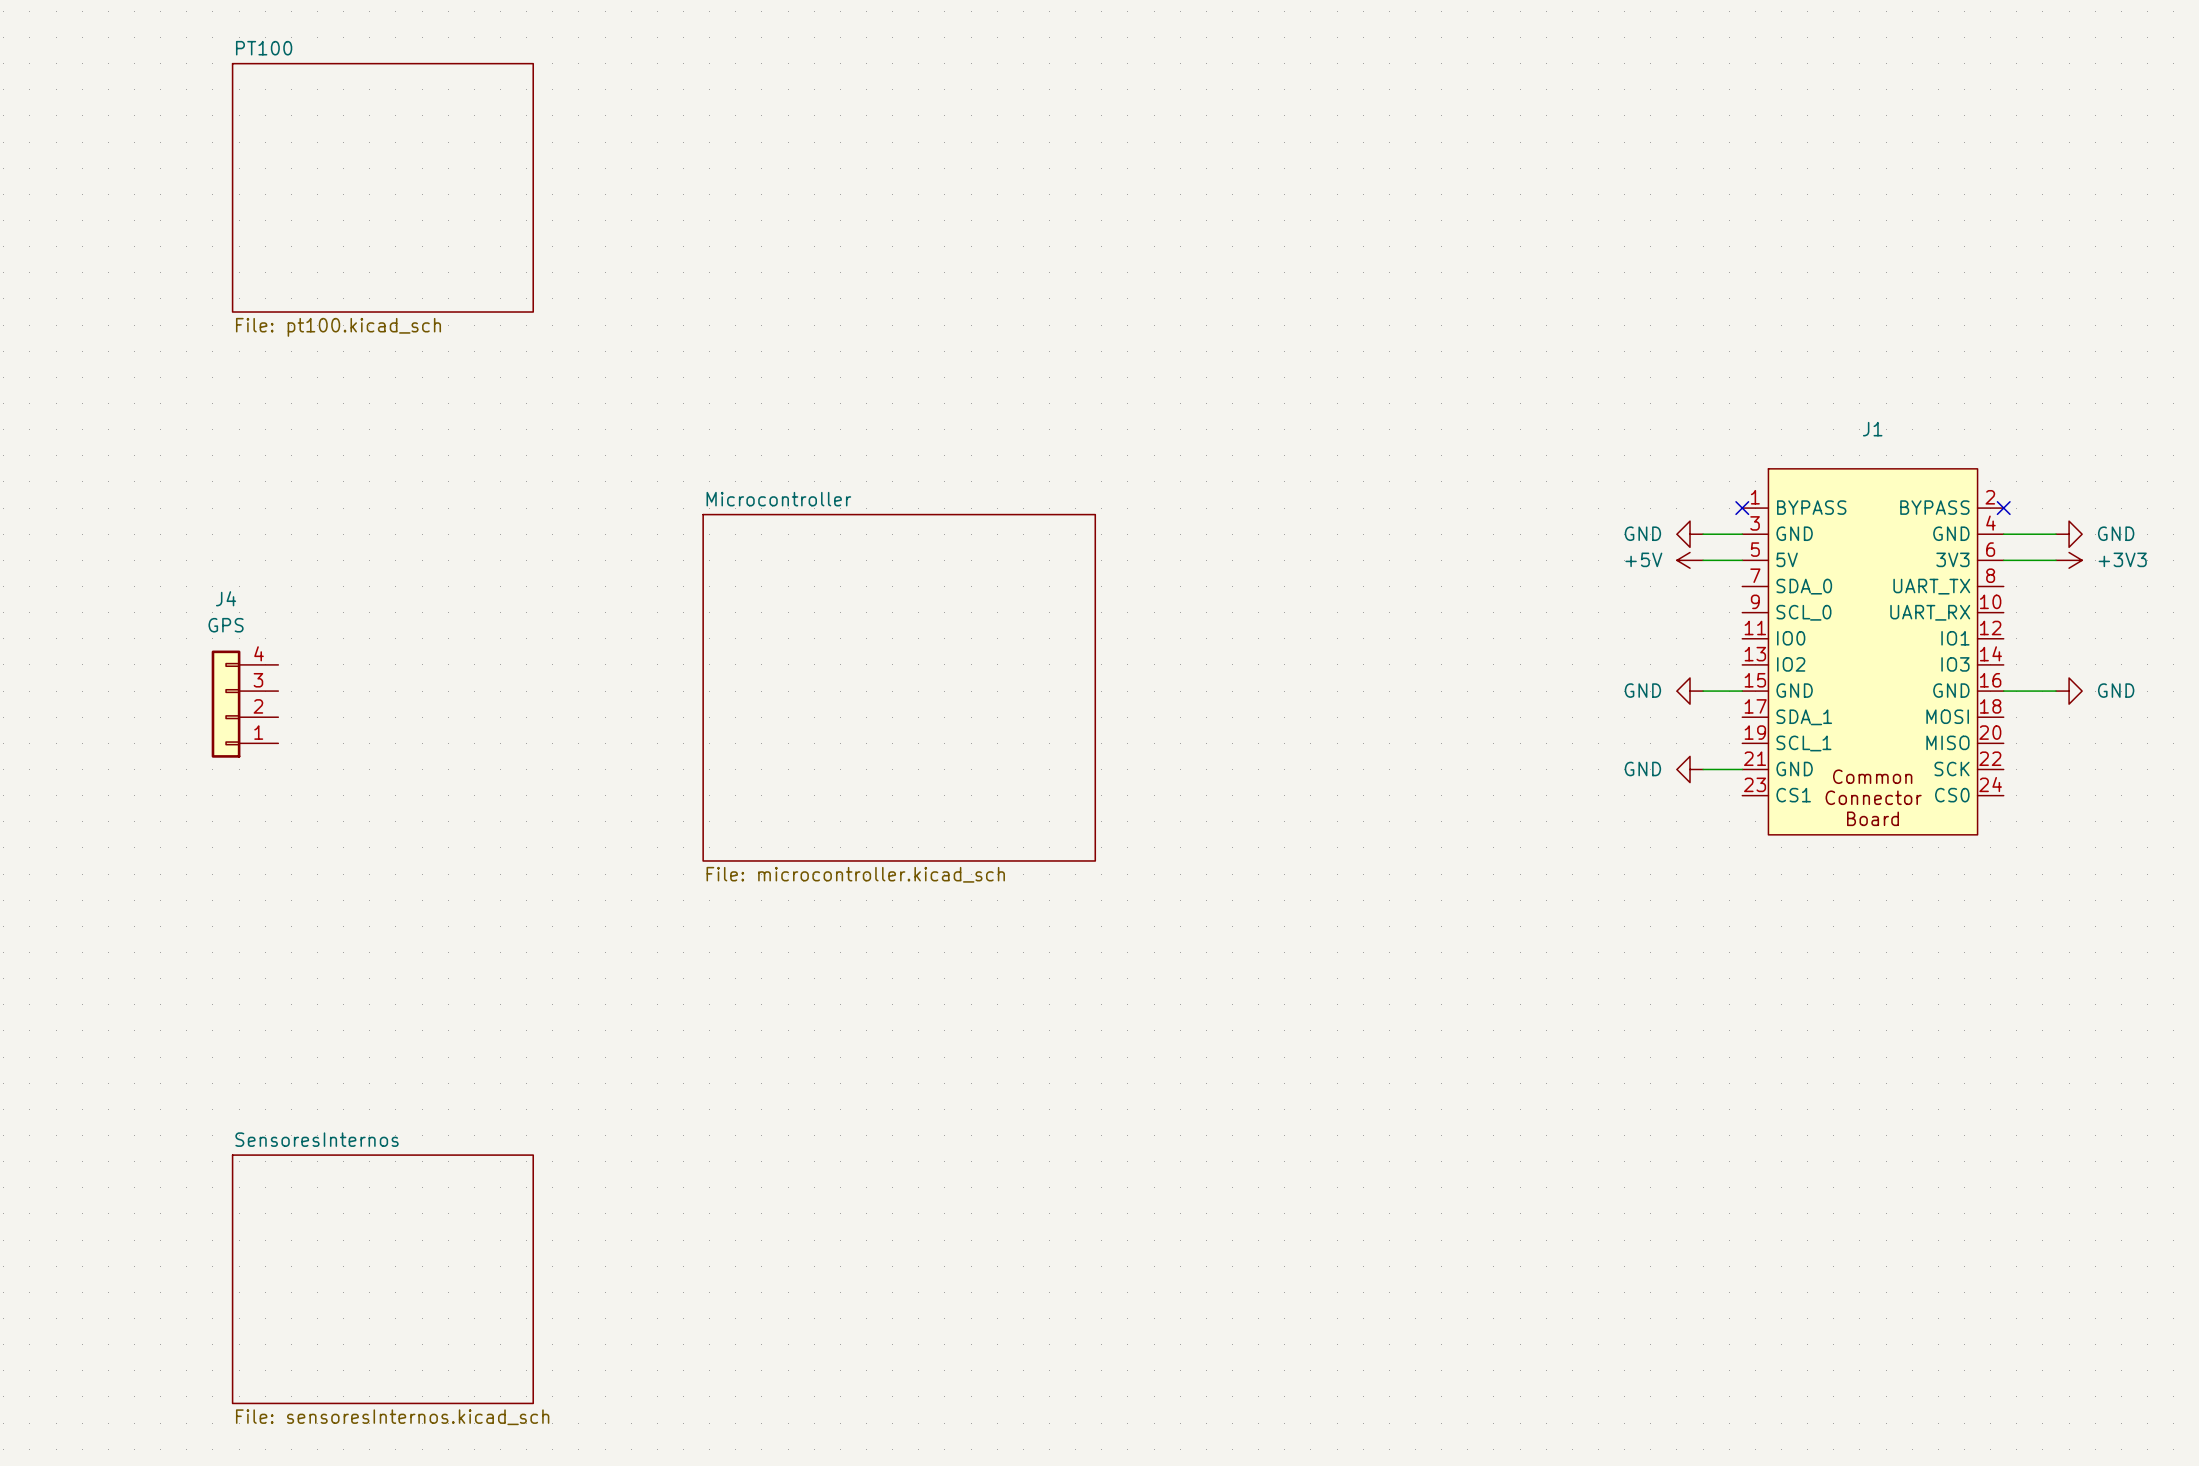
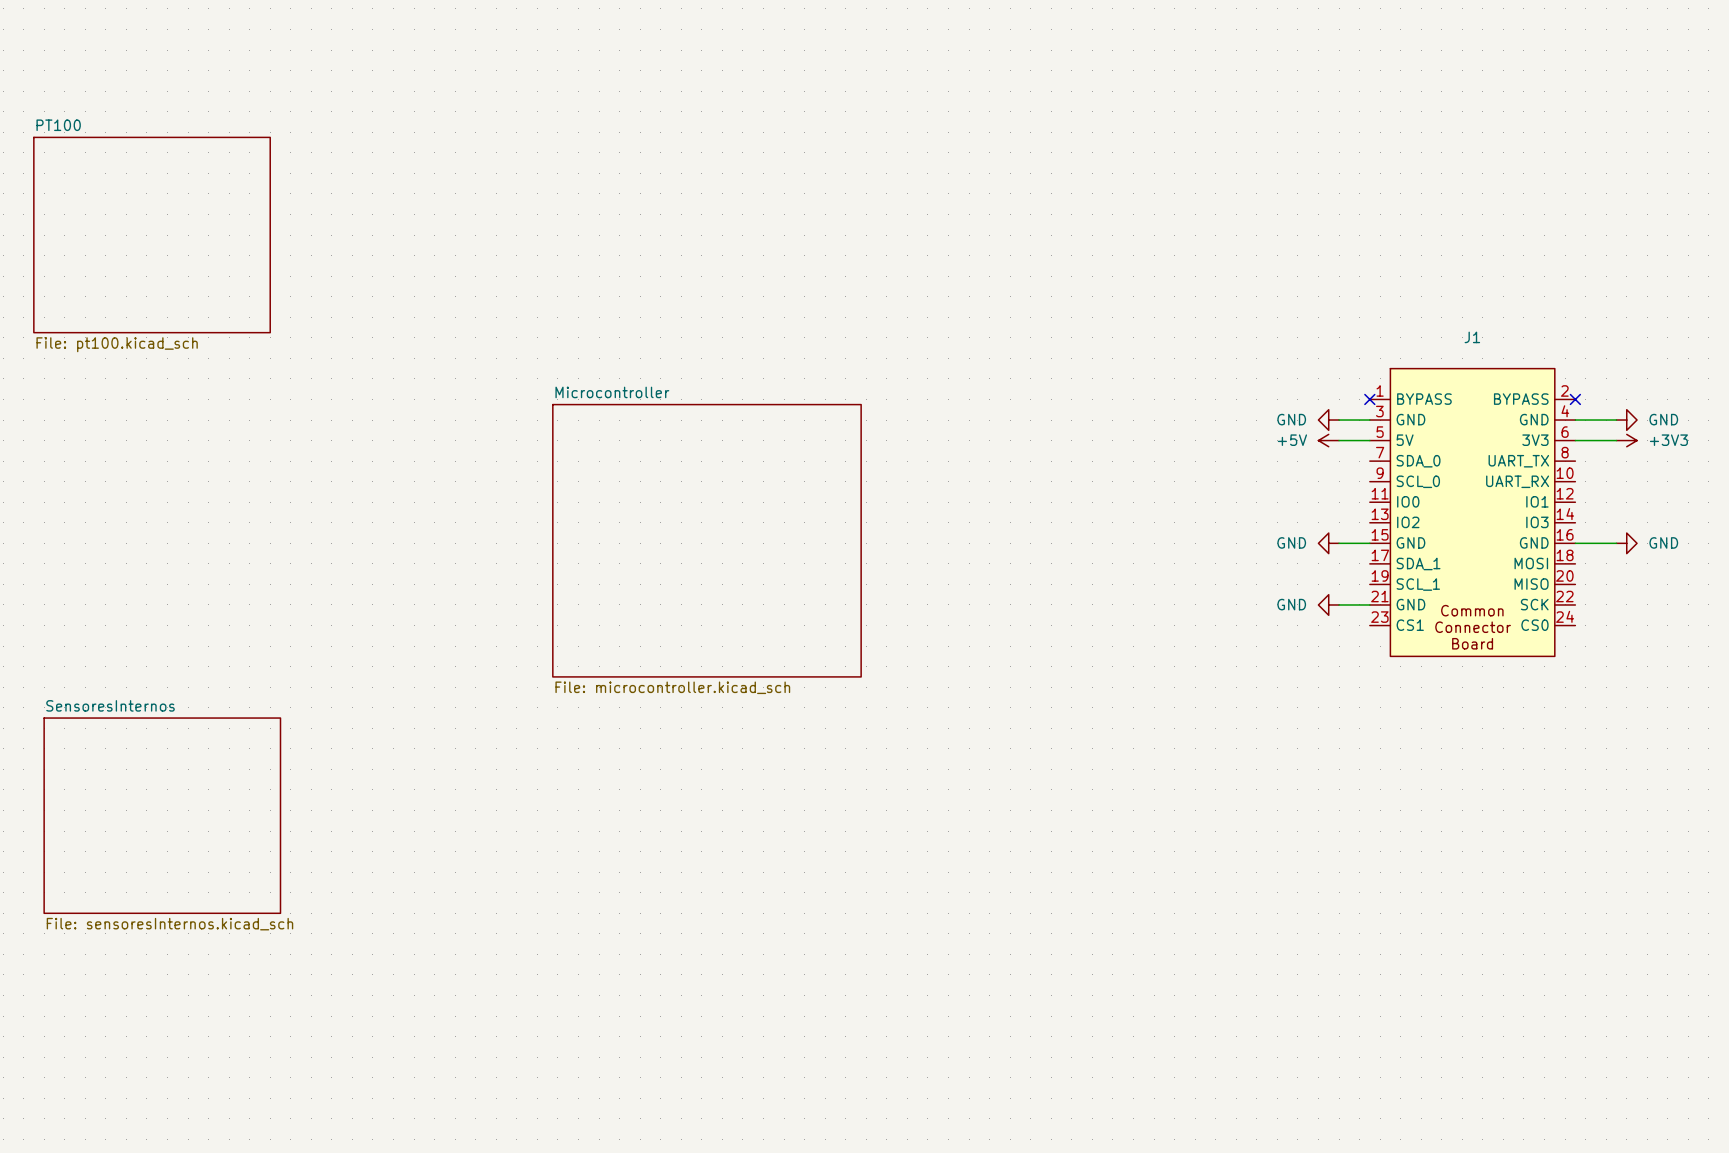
sheet PT100 position: (382, 187) -> (152, 235)
J4: GPS (245, 704) -> none
sheet SensoresInternos: none -> File: sensoresInternos.kicad_sch (162, 815)
sheet SensoresInternos: File: sensoresInternos.kicad_sch (382, 1279) -> none

